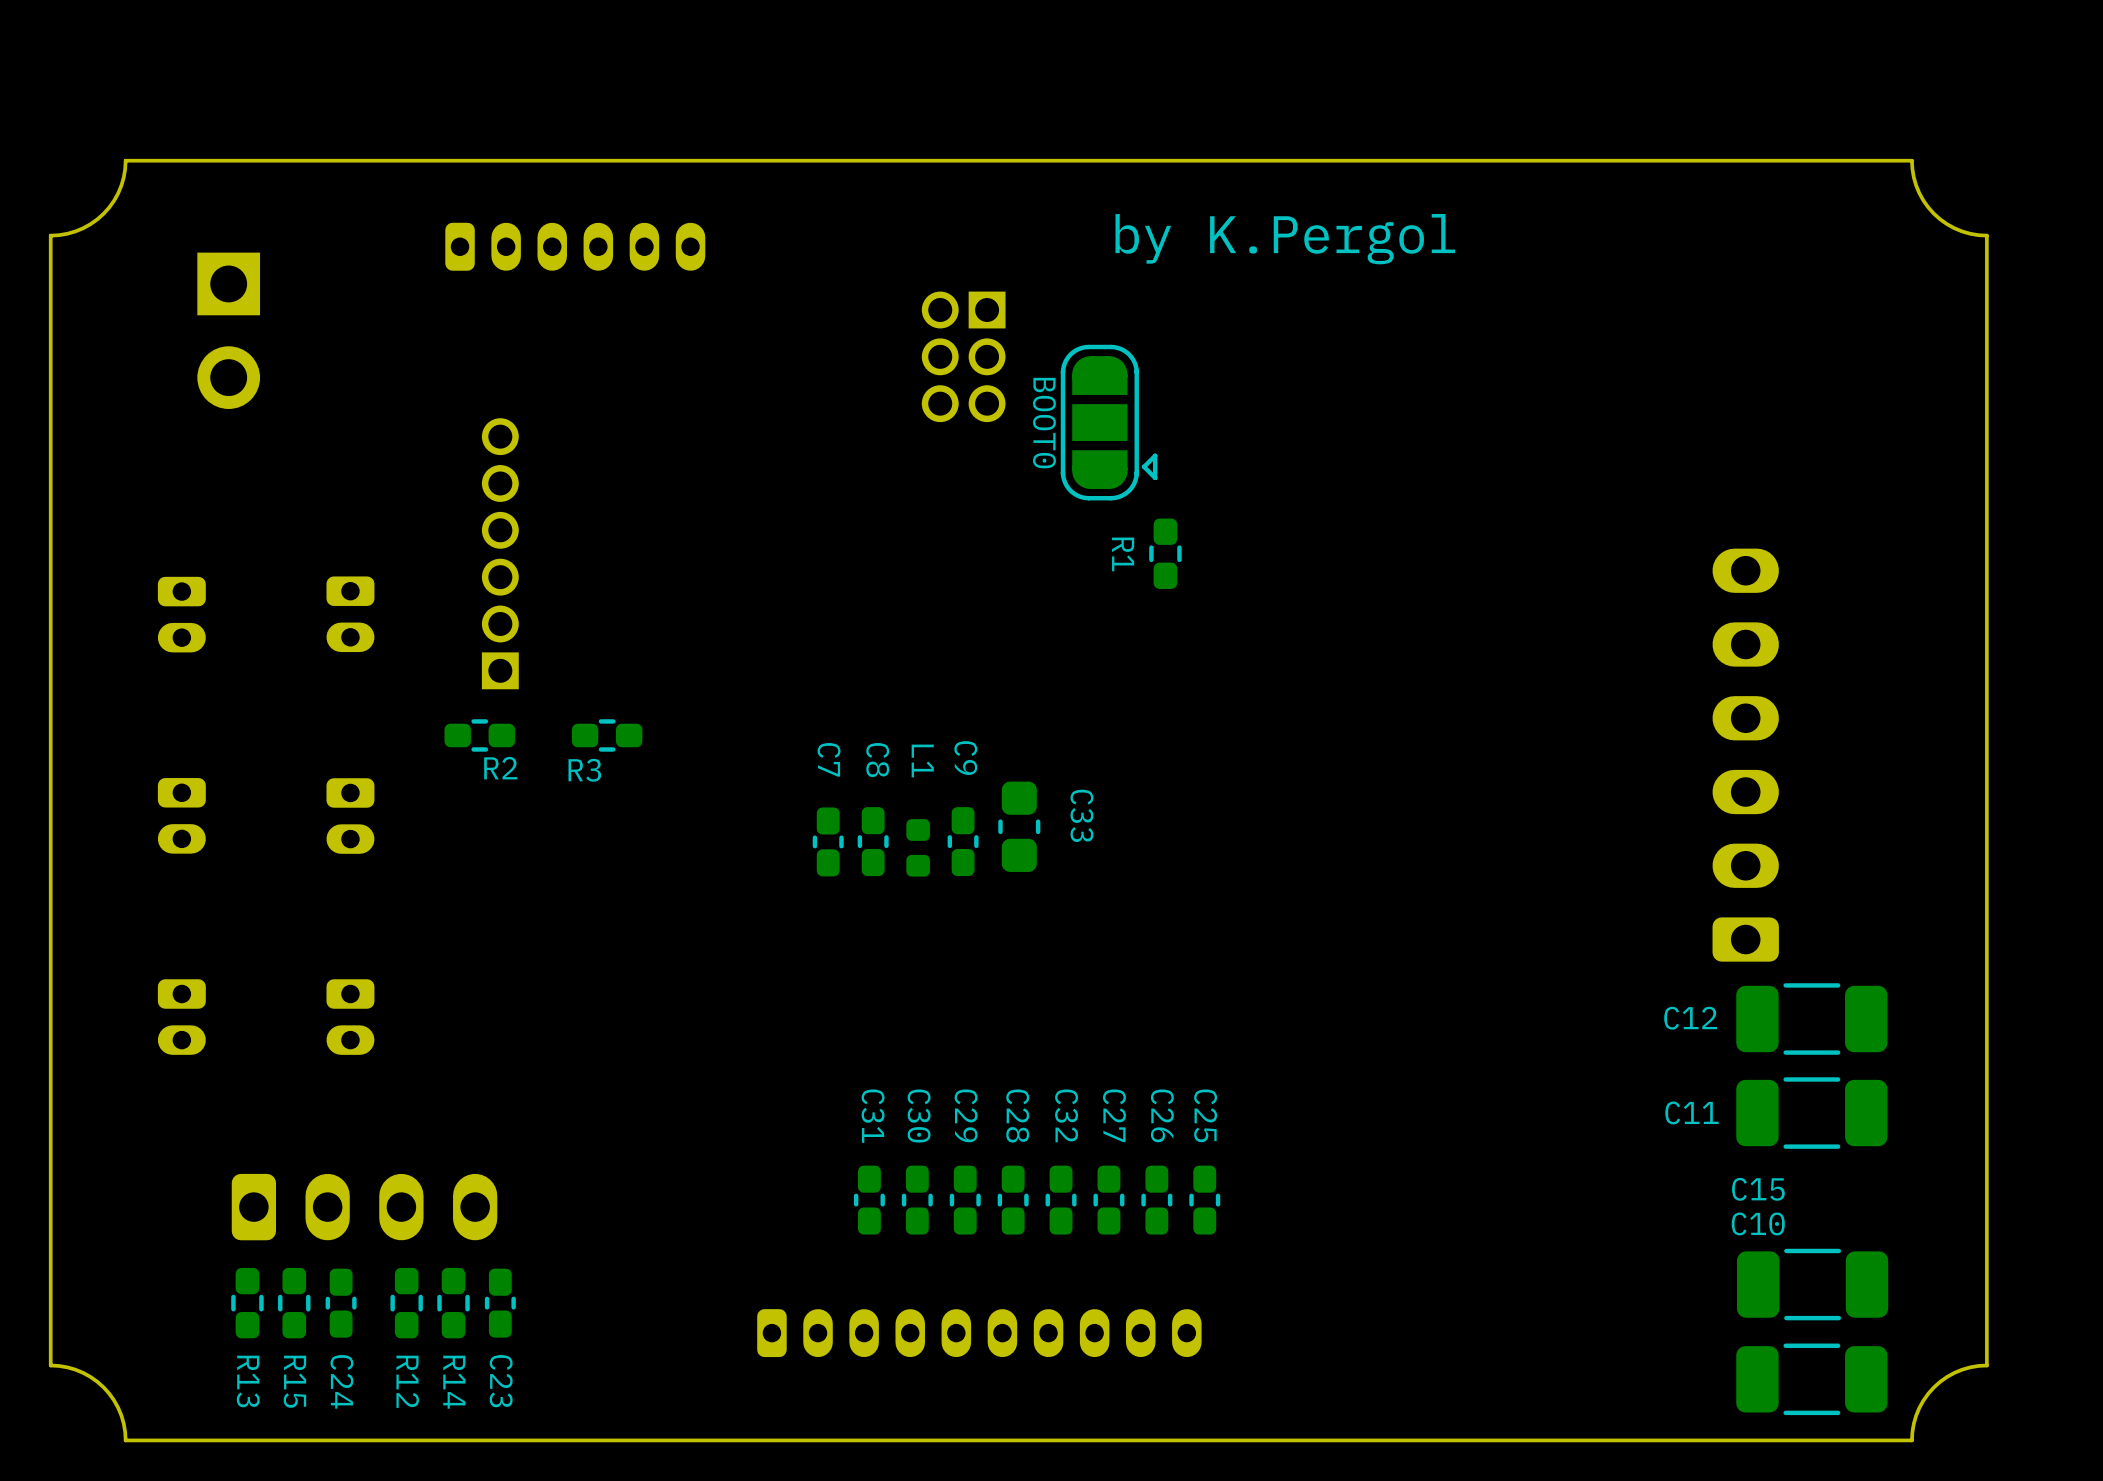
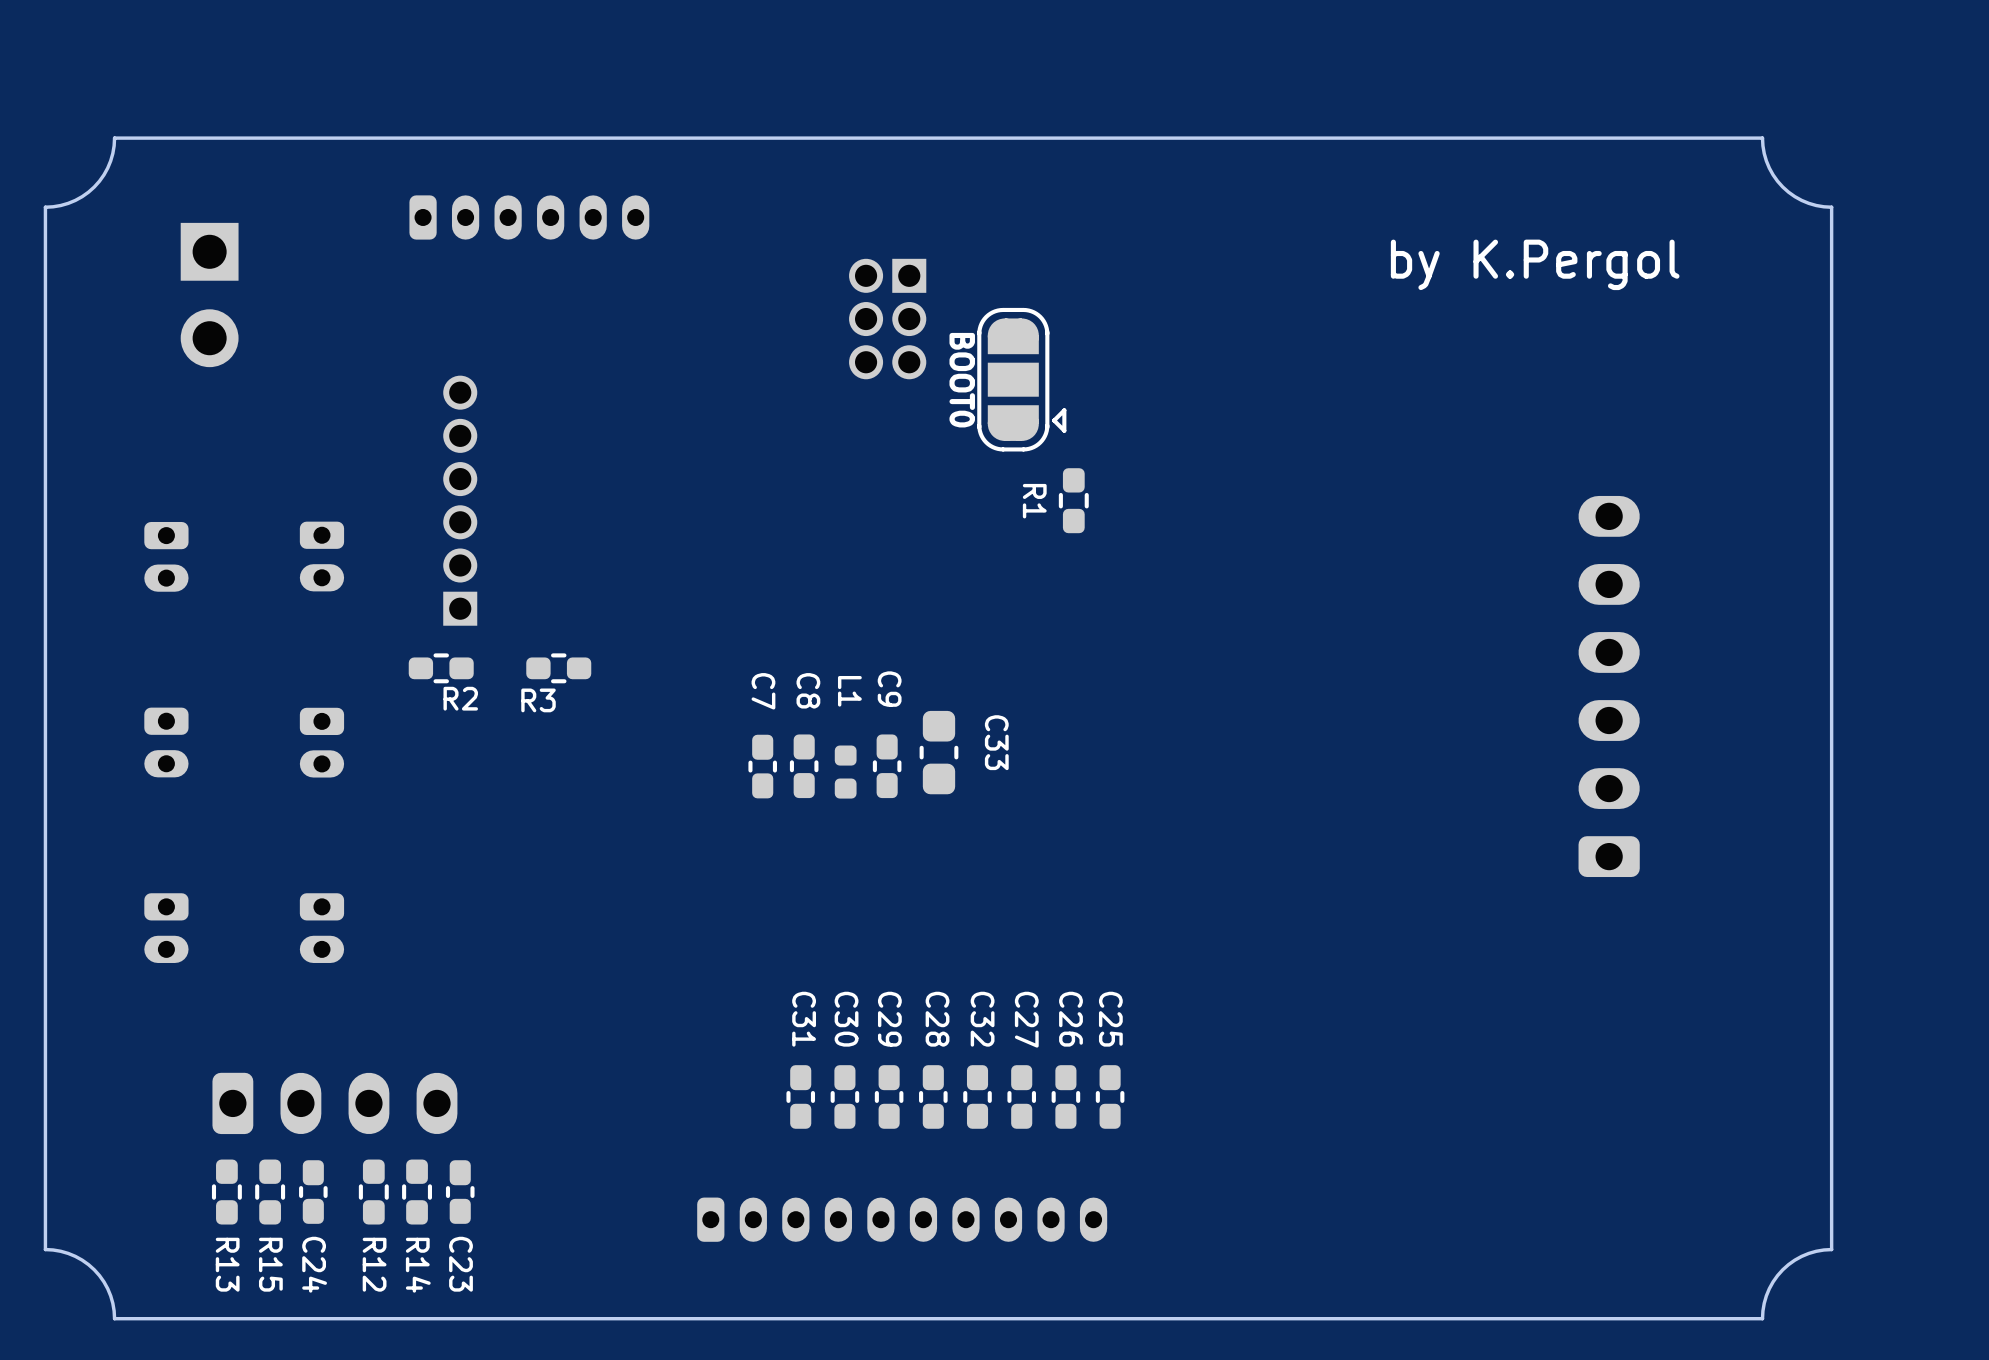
text position: by K.Pergol (1285, 239) -> by K.Pergol (1535, 264)
C12: (1811, 1019) -> none
C11: (1811, 1113) -> none
C15: (1812, 1284) -> none
C10: (1811, 1379) -> none

